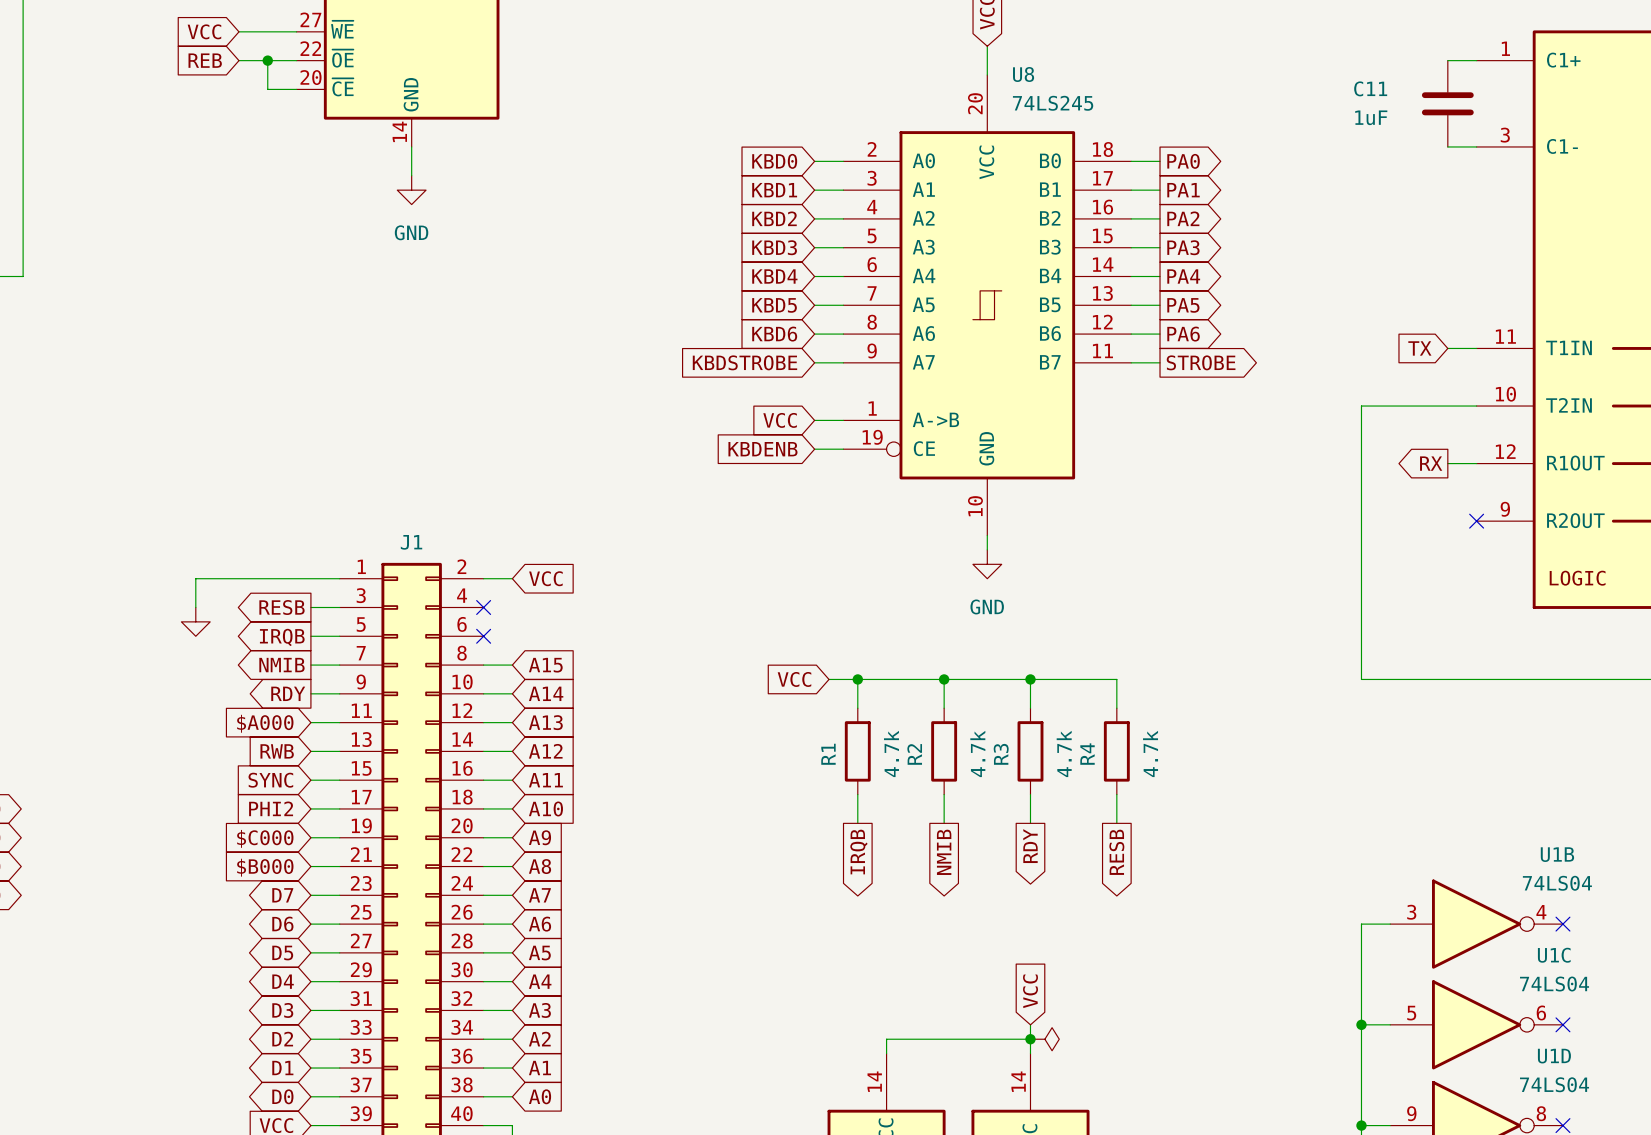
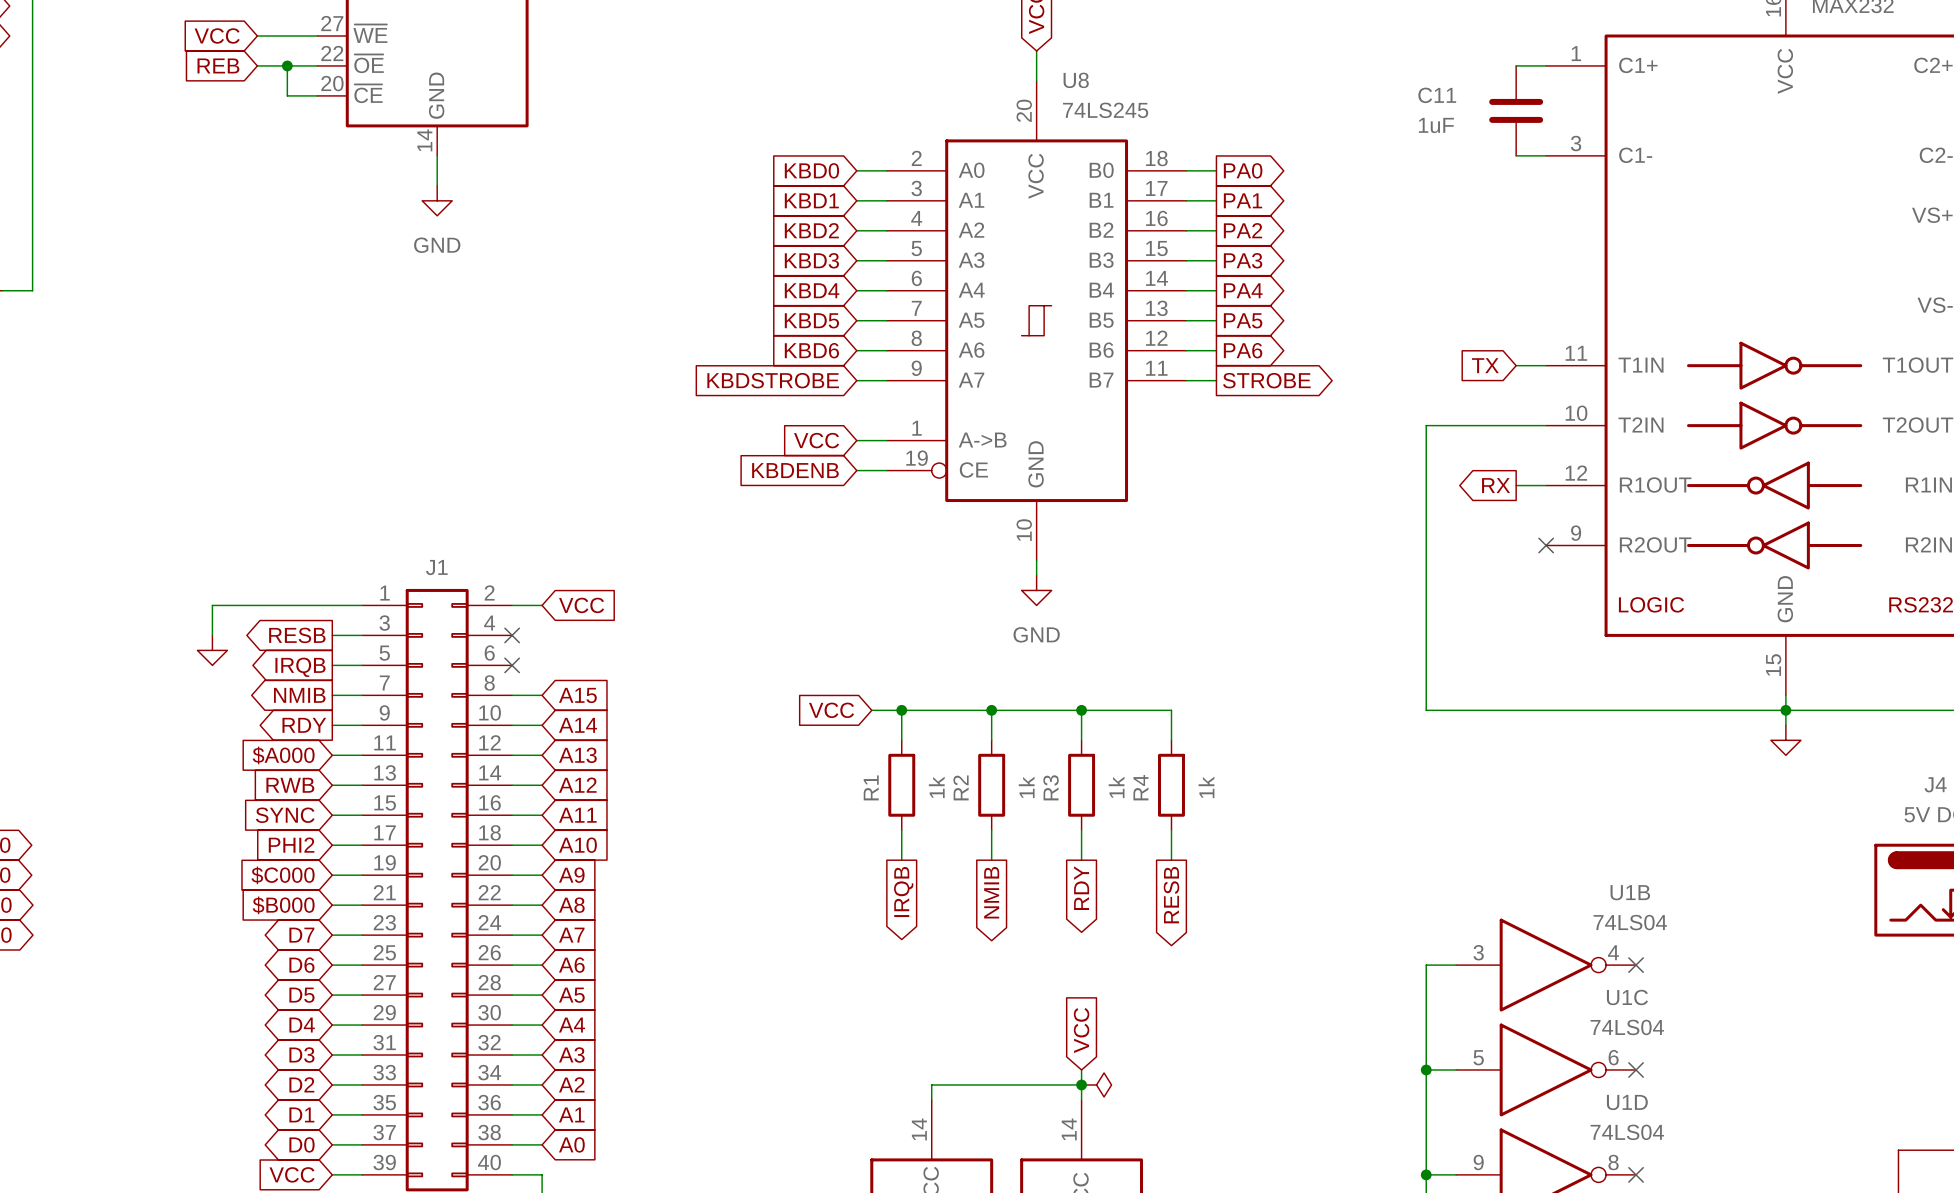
R1 value: 4.7k (891, 753) -> 1k (936, 787)
R2 value: 4.7k (977, 753) -> 1k (1026, 787)
R3 value: 4.7k (1064, 753) -> 1k (1116, 787)
R4 value: 4.7k (1150, 753) -> 1k (1206, 787)

